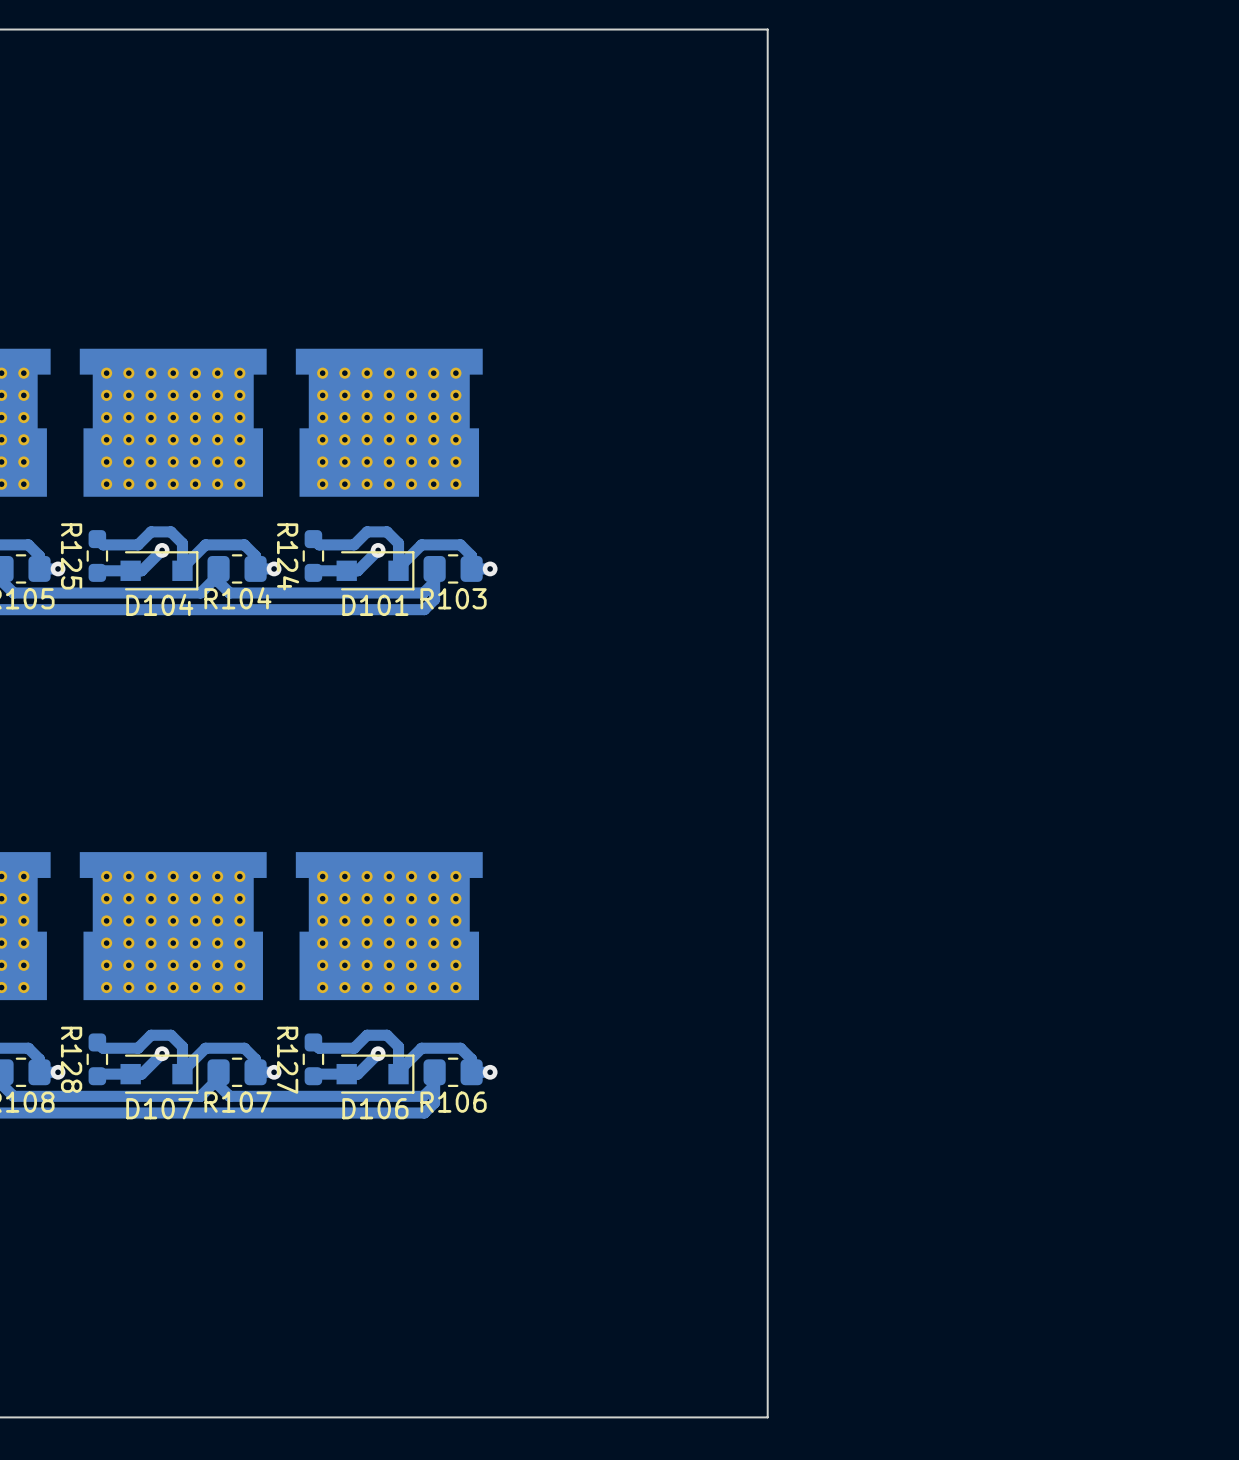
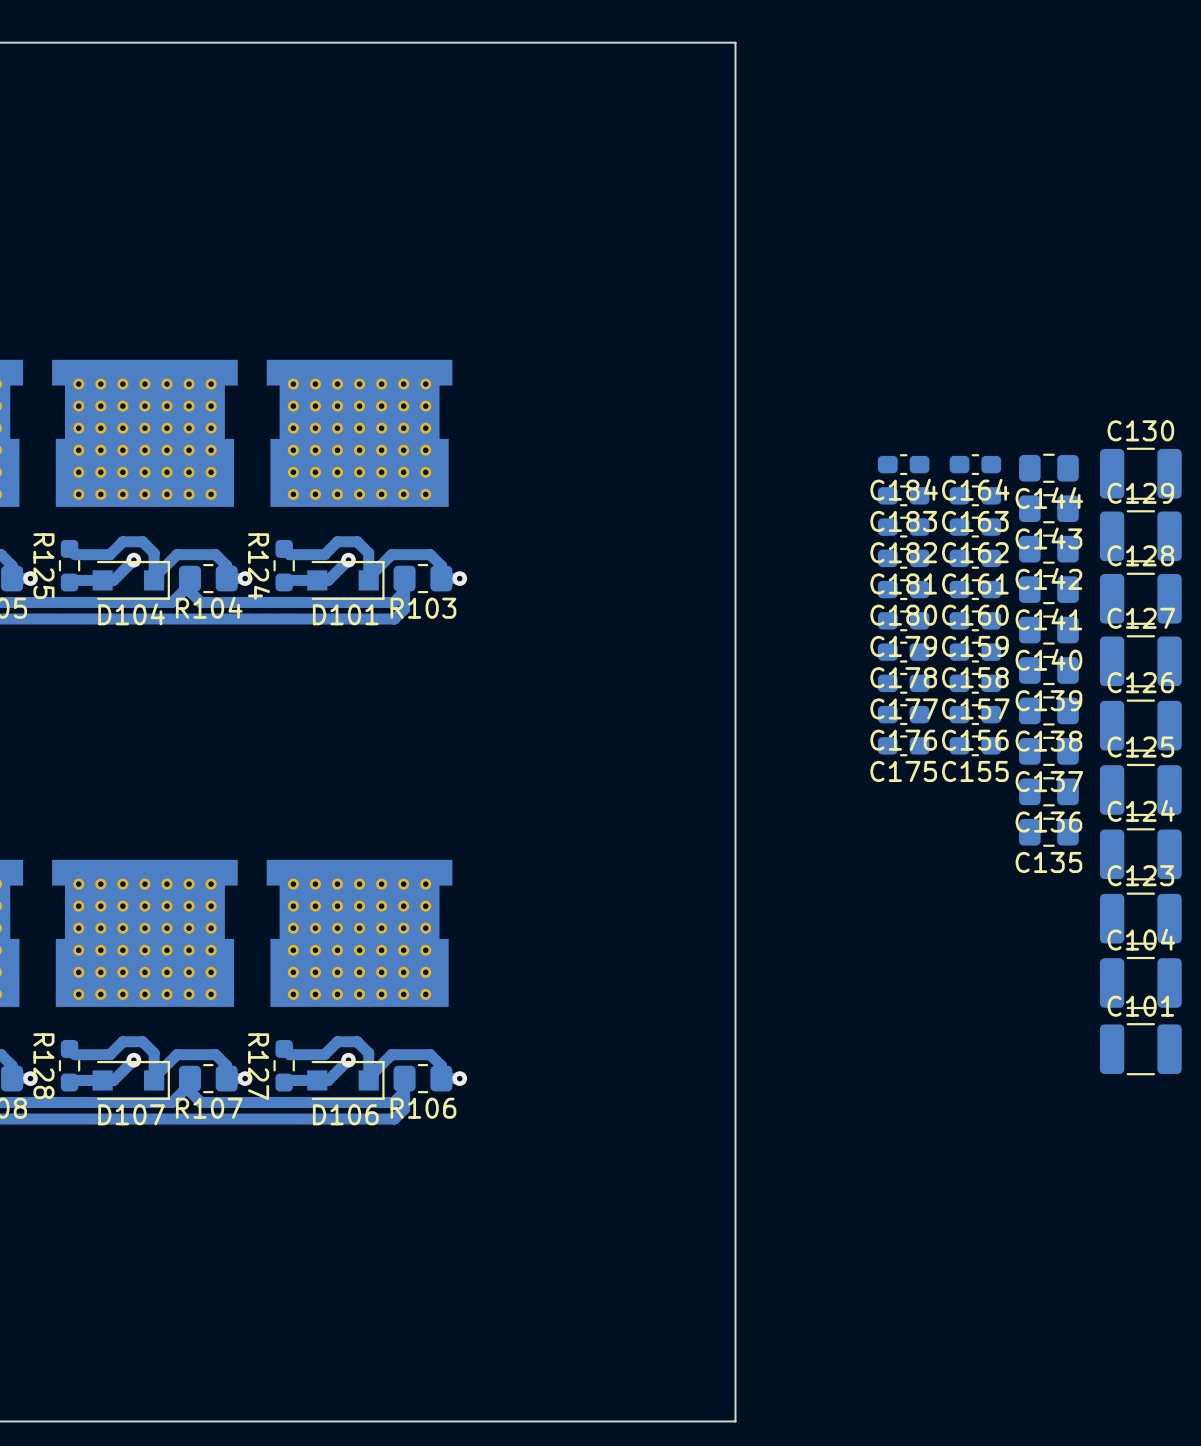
C184: none -> (903, 464)
C164: none -> (975, 464)
C144: none -> (1048, 468)
C130: none -> (1140, 473)
C183: none -> (903, 495)
C163: none -> (975, 495)
C143: none -> (1048, 508)
C182: none -> (903, 527)
C162: none -> (975, 527)
C129: none -> (1140, 536)
C142: none -> (1048, 549)
C181: none -> (903, 558)
C161: none -> (975, 558)
C180: none -> (903, 589)
C160: none -> (975, 589)
C141: none -> (1048, 589)
C128: none -> (1140, 598)
C179: none -> (903, 620)
C159: none -> (975, 620)
C140: none -> (1048, 630)
C178: none -> (903, 652)
C158: none -> (975, 652)
C127: none -> (1140, 661)
C139: none -> (1048, 670)
C177: none -> (903, 683)
C157: none -> (975, 683)
C138: none -> (1048, 710)
C176: none -> (903, 714)
C156: none -> (975, 714)
C126: none -> (1140, 725)
C175: none -> (903, 745)
C155: none -> (975, 745)
C137: none -> (1048, 751)
C125: none -> (1140, 789)
C136: none -> (1048, 791)
C135: none -> (1048, 832)
C124: none -> (1140, 854)
C123: none -> (1140, 918)
C104: none -> (1140, 983)
C101: none -> (1140, 1049)

